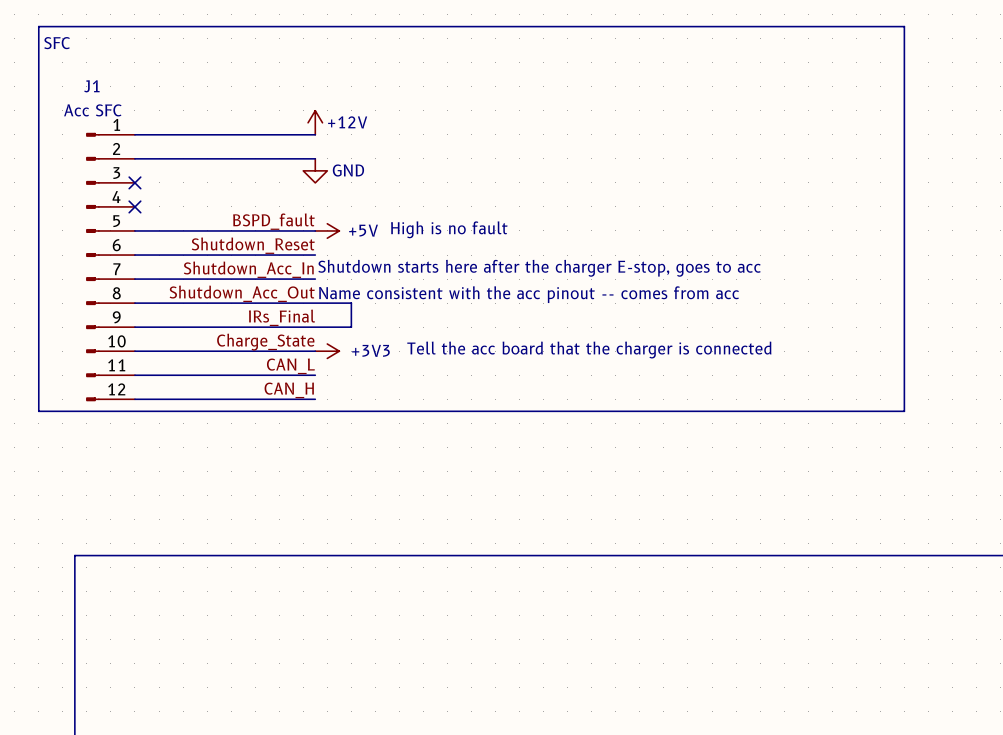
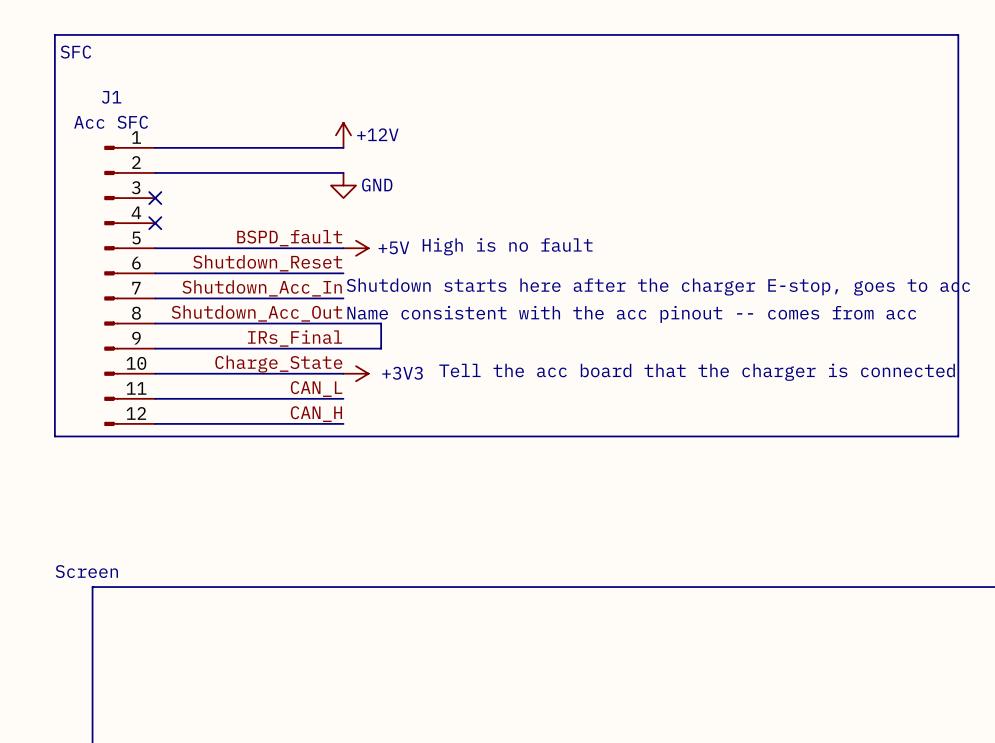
text: none -> Screen (86, 571)

